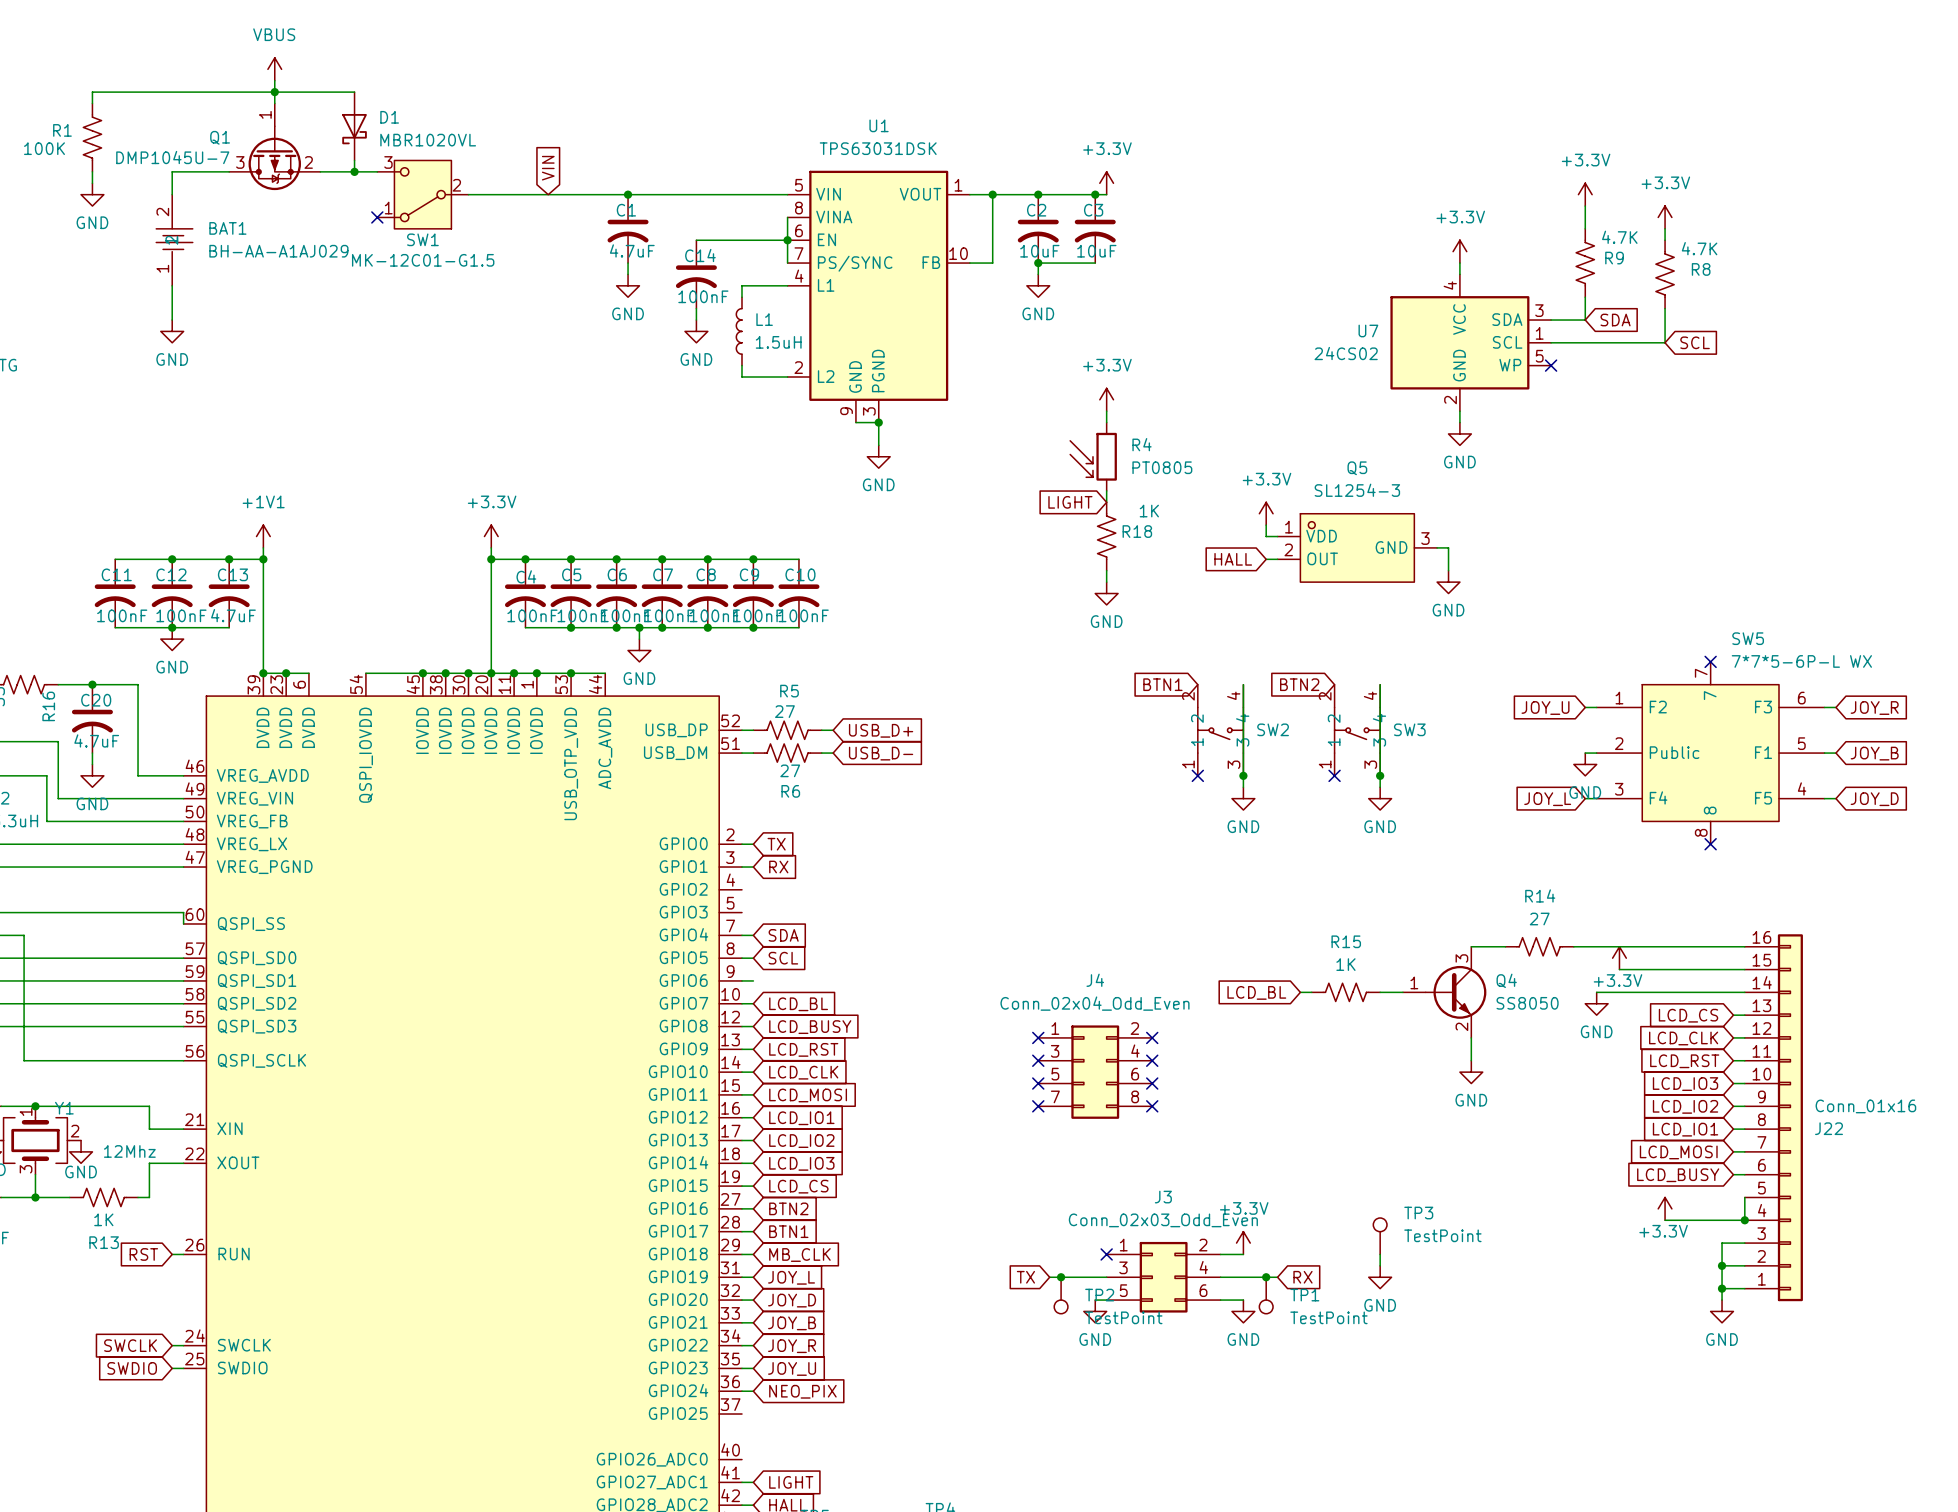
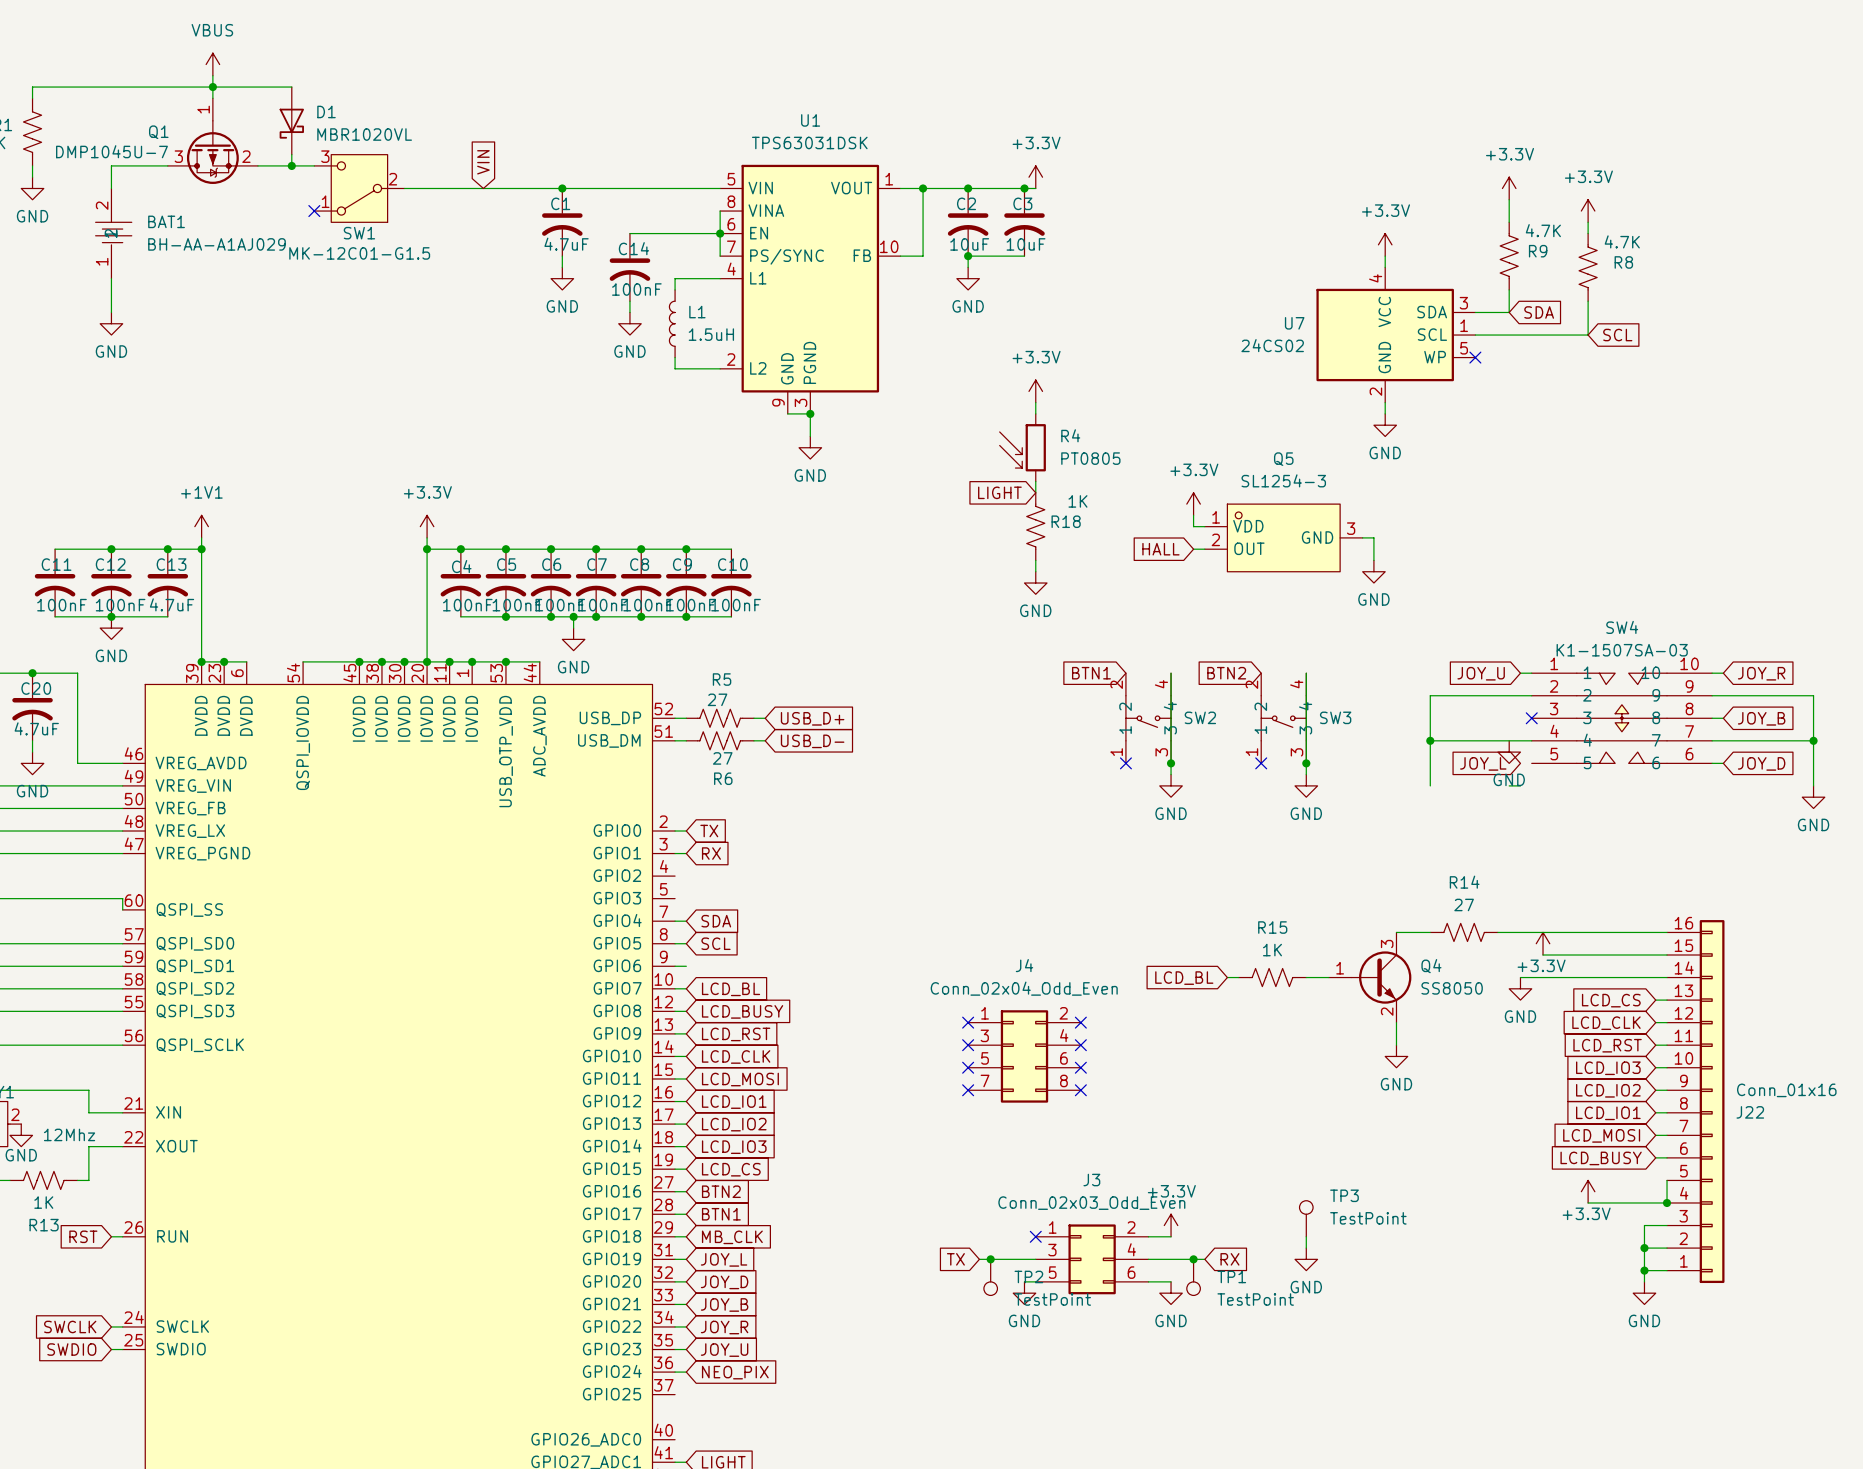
no-connect mark: (1710, 661) -> none
wire: none -> (1520, 673) (1531, 673)
wire: none -> (1712, 673) (1723, 673)
wire: none -> (1509, 695) (1430, 695) (1430, 785)
wire: none -> (1757, 695) (1813, 695) (1813, 785)
global label position: JOY_U (1545, 708) -> JOY_U (1481, 673)
global label position: JOY_R (1874, 708) -> JOY_R (1761, 673)
no-connect mark: none -> (1531, 718)
SW4: none -> K1-1507SA-03 (1621, 718)
wire: none -> (1712, 718) (1723, 718)
wire: none -> (1430, 740) (1509, 740)
junction: none -> (1430, 740)
SW5: 7*7*5-6P-L WX (1710, 753) -> none
wire: none -> (1757, 740) (1813, 740)
global label position: JOY_B (1874, 753) -> JOY_B (1761, 718)
junction: none -> (1813, 740)
wire: (1824, 798) (1835, 798) -> (1712, 763) (1723, 763)
global label position: JOY_L (1547, 799) -> JOY_L (1483, 763)
global label position: JOY_D (1874, 799) -> JOY_D (1761, 763)
power symbol: none -> GND (1813, 797)
no-connect mark: (1710, 844) -> none

